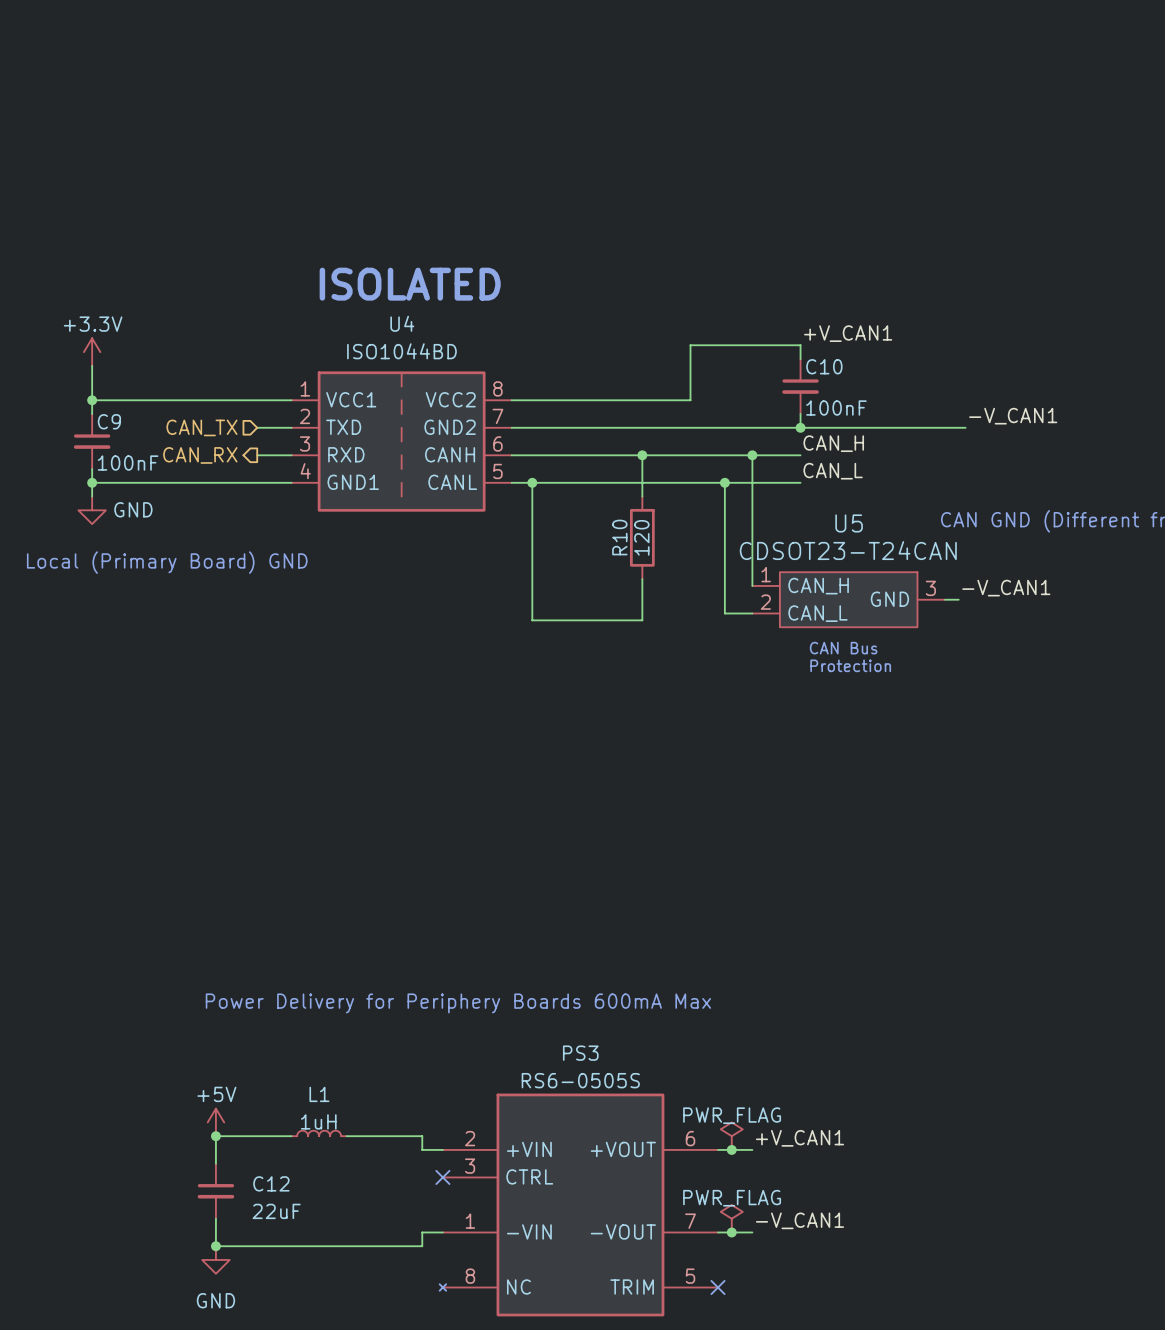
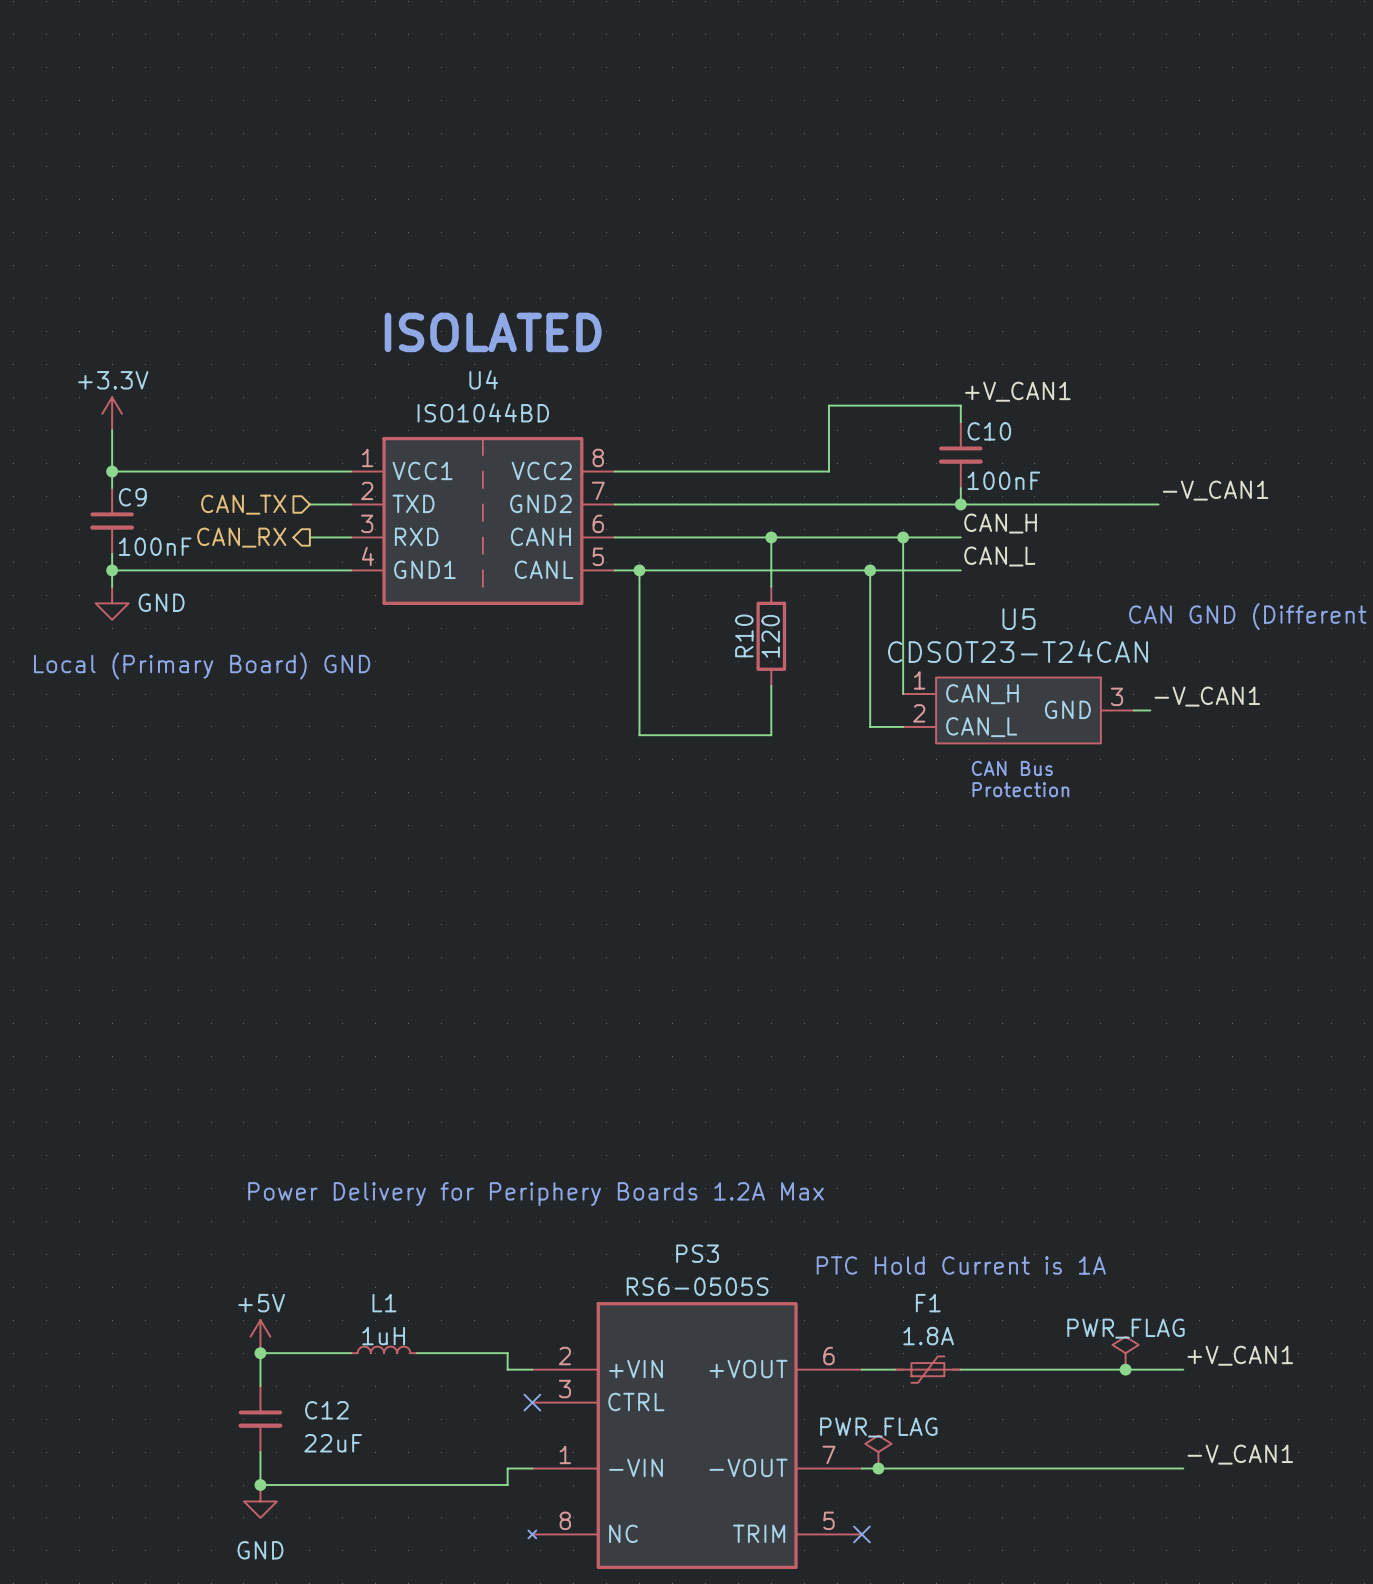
text: Power Delivery for Periphery Boards 600mA Max (458, 1003) -> Power Delivery for Periphery Boards 1.2A Max (536, 1194)
text: none -> PTC Hold Current is 1A (961, 1265)
power symbol position: PWR_FLAG (731, 1136) -> PWR_FLAG (1125, 1353)
label position: +V_CAN1 (799, 1138) -> +V_CAN1 (1240, 1355)
junction: (731, 1149) -> none
F1: none -> 1.8A (927, 1369)
wire: none -> (960, 1369) (1183, 1369)
junction: none -> (1125, 1369)
label position: -V_CAN1 (799, 1220) -> -V_CAN1 (1240, 1454)
wire: none -> (903, 1468) (1183, 1468)

